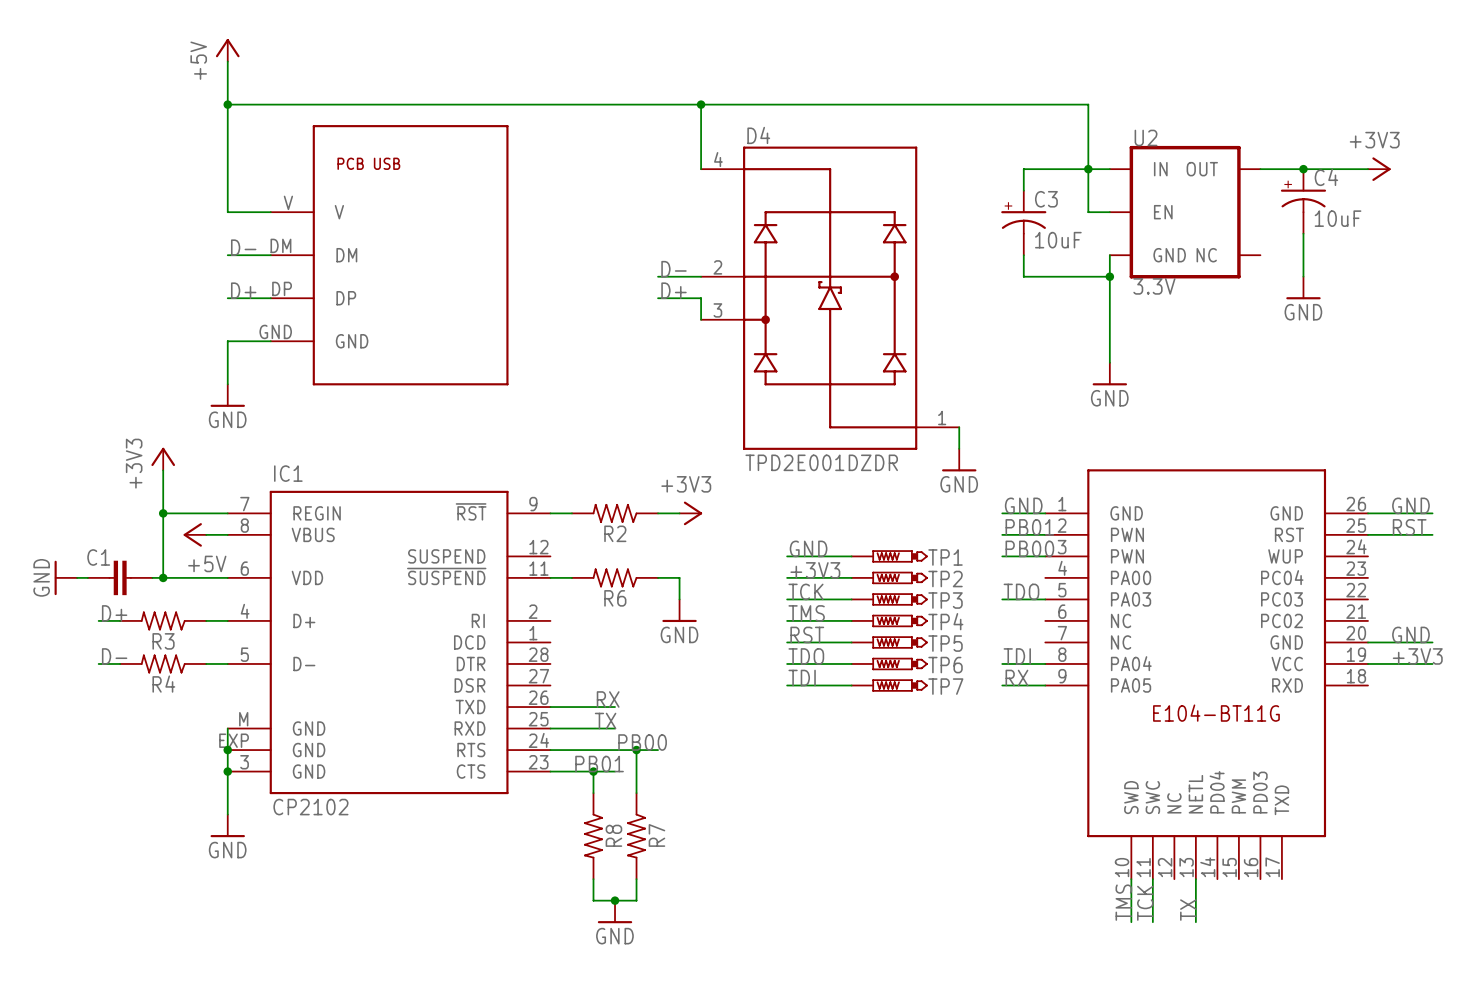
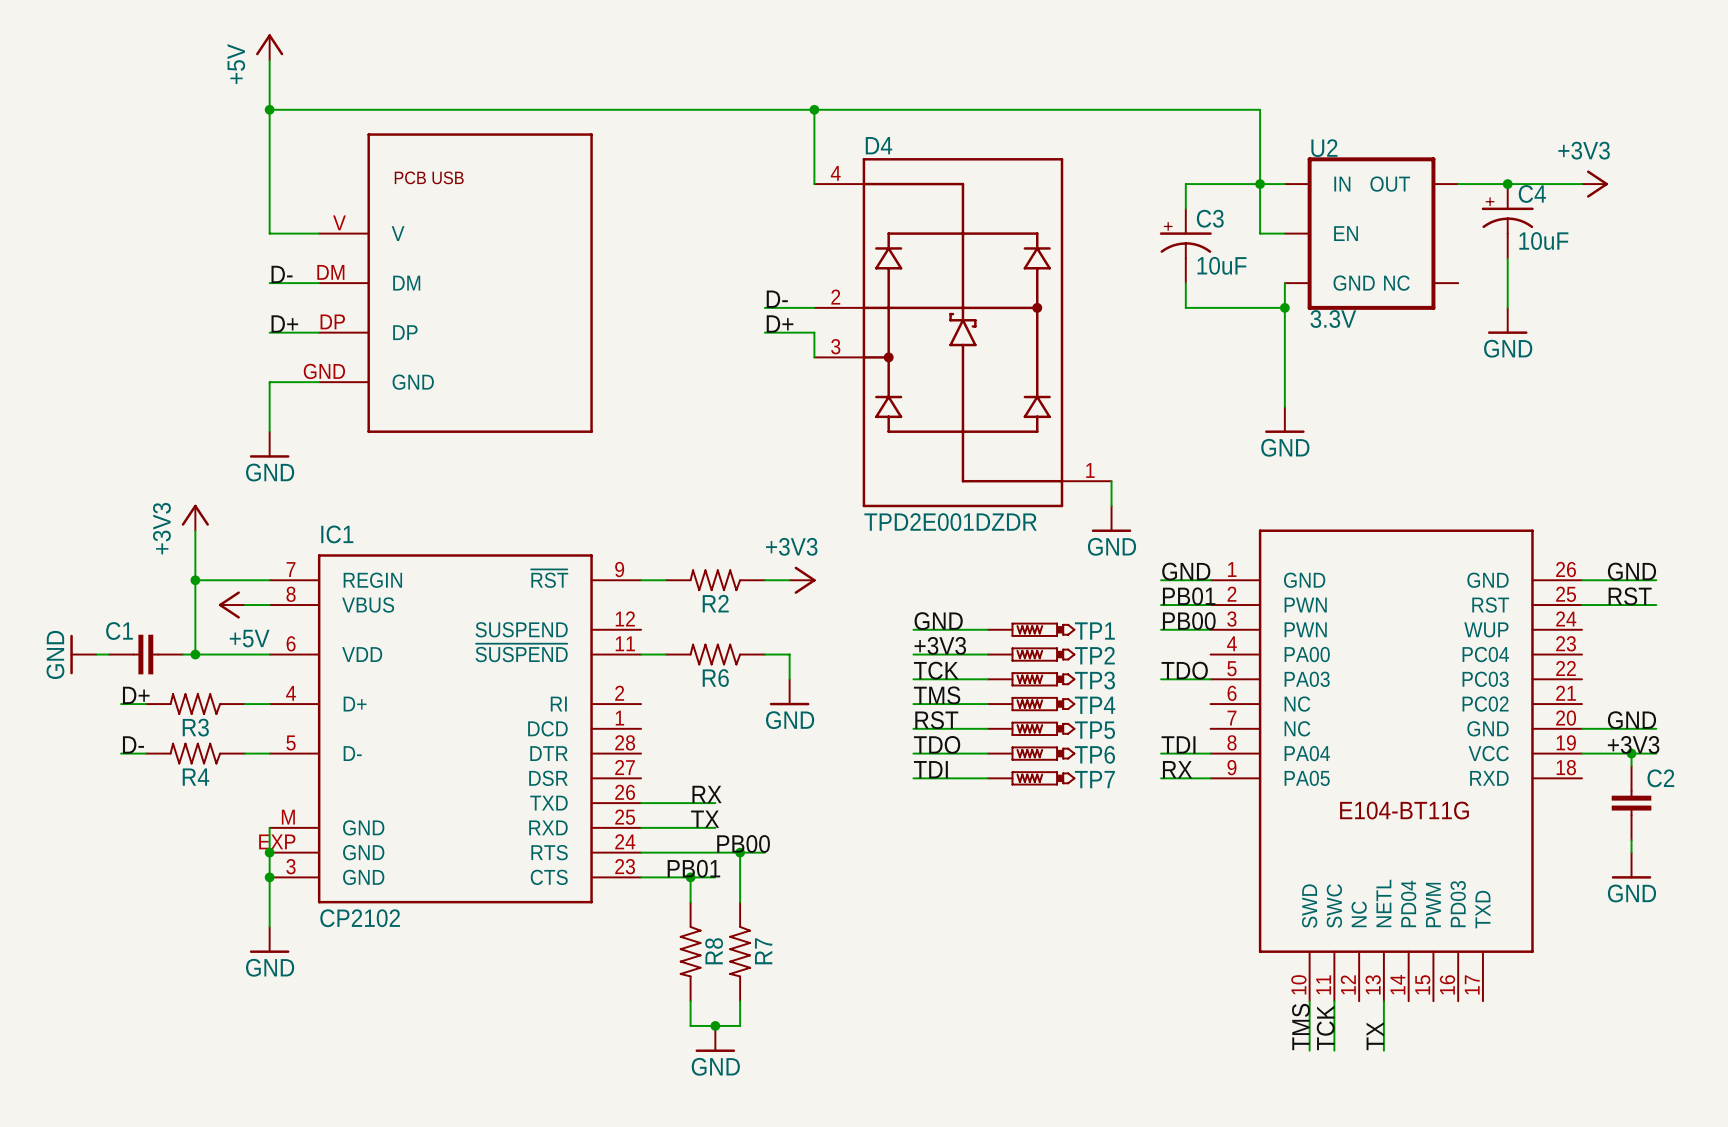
wire: none -> (1631, 753) (1631, 765)
junction: none -> (1631, 753)
C2: none -> (1631, 803)
wire: none -> (1631, 840) (1631, 852)
power symbol: none -> GND (1631, 865)

